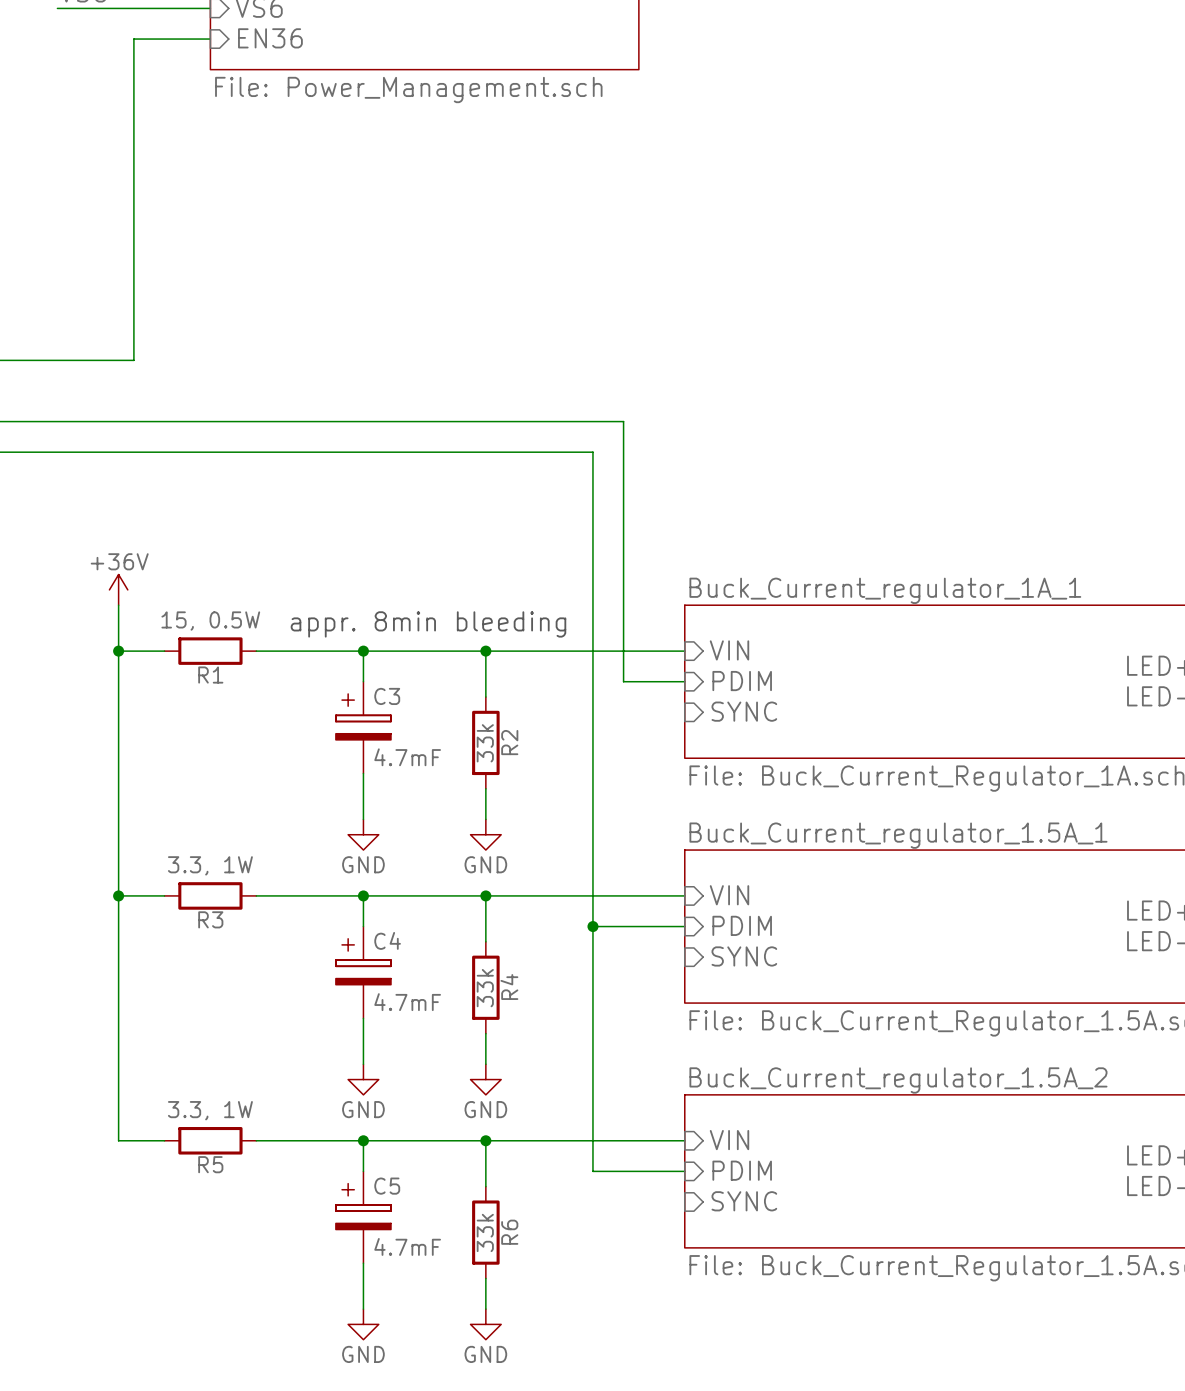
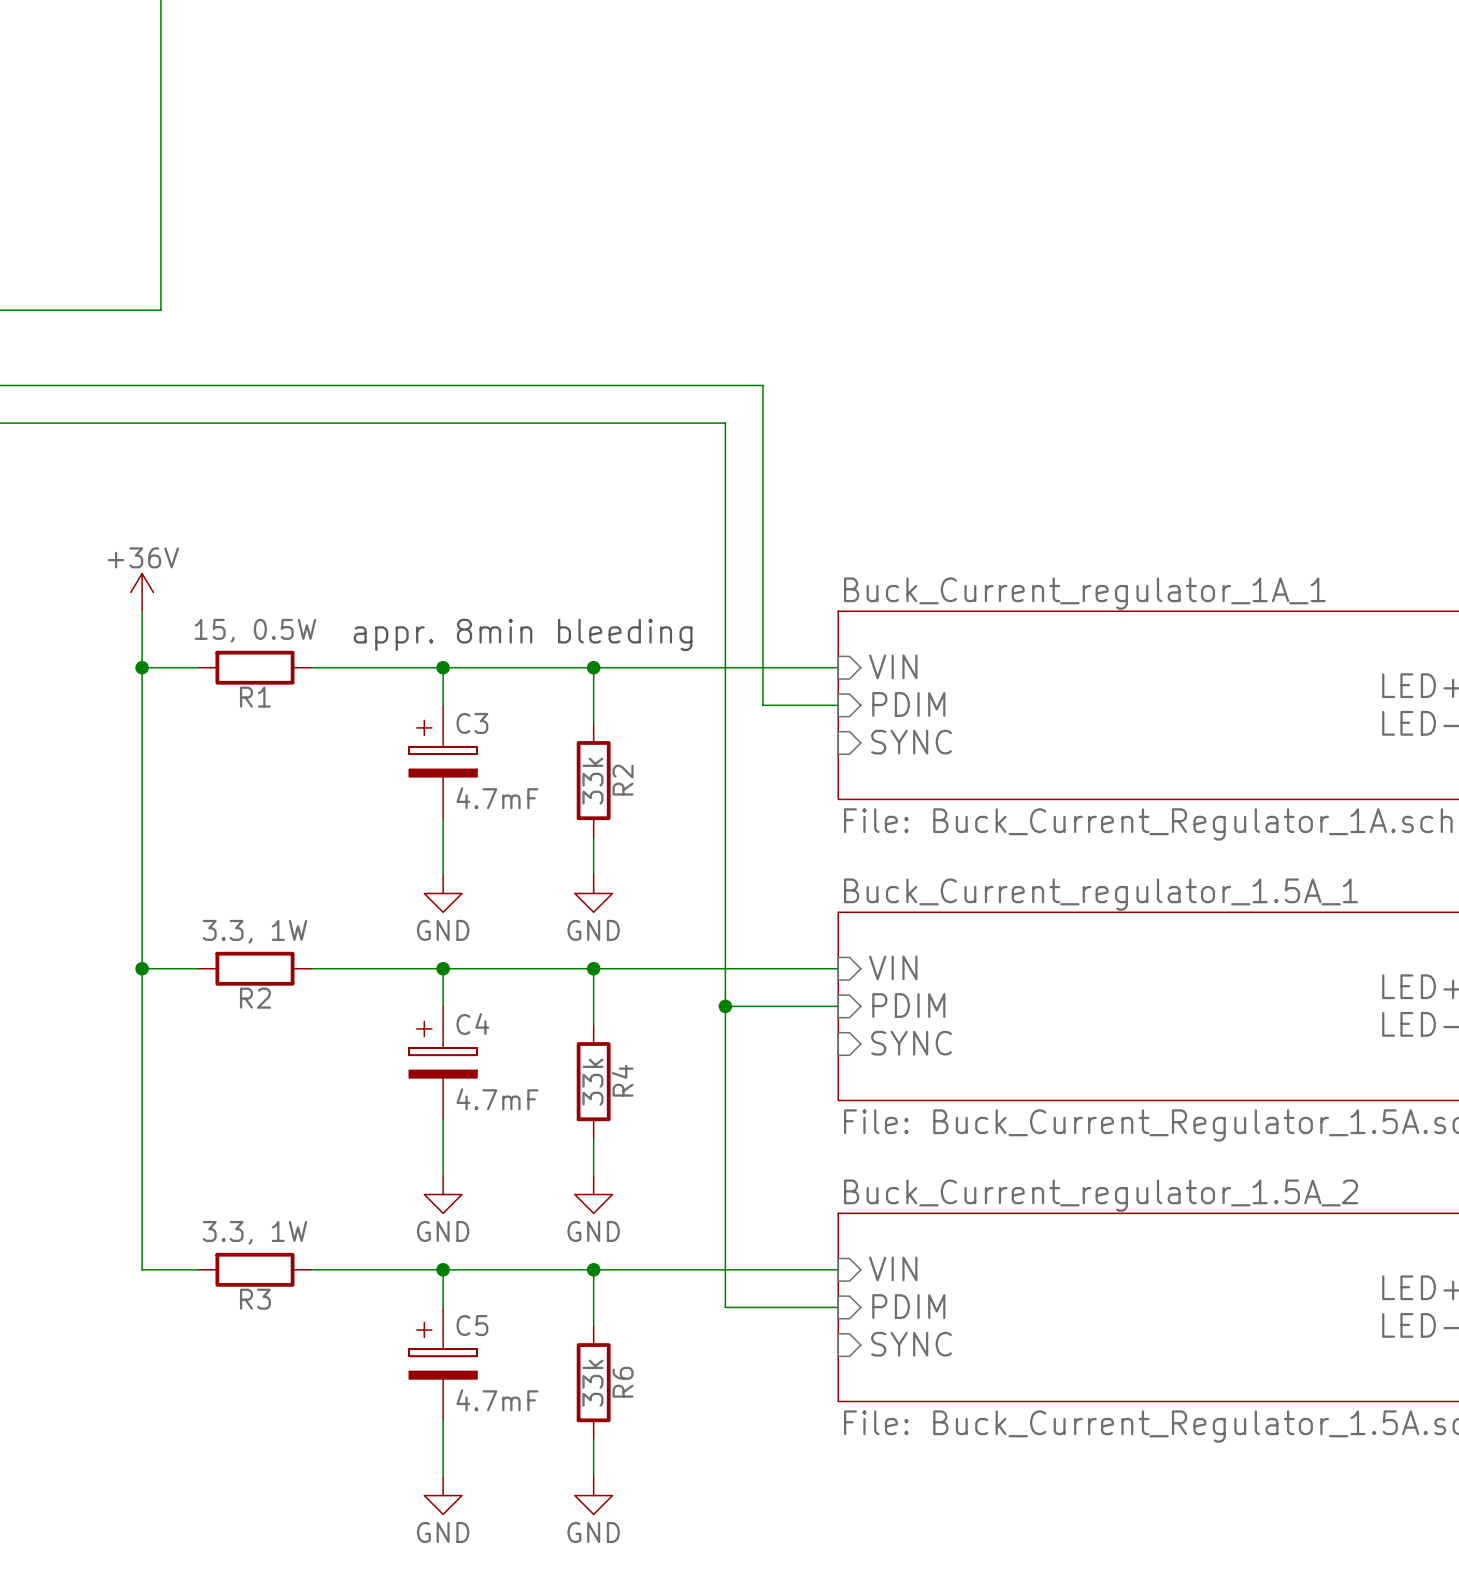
R3 name: R3 (210, 919) -> R2 (255, 998)
R5 name: R5 (210, 1164) -> R3 (255, 1299)

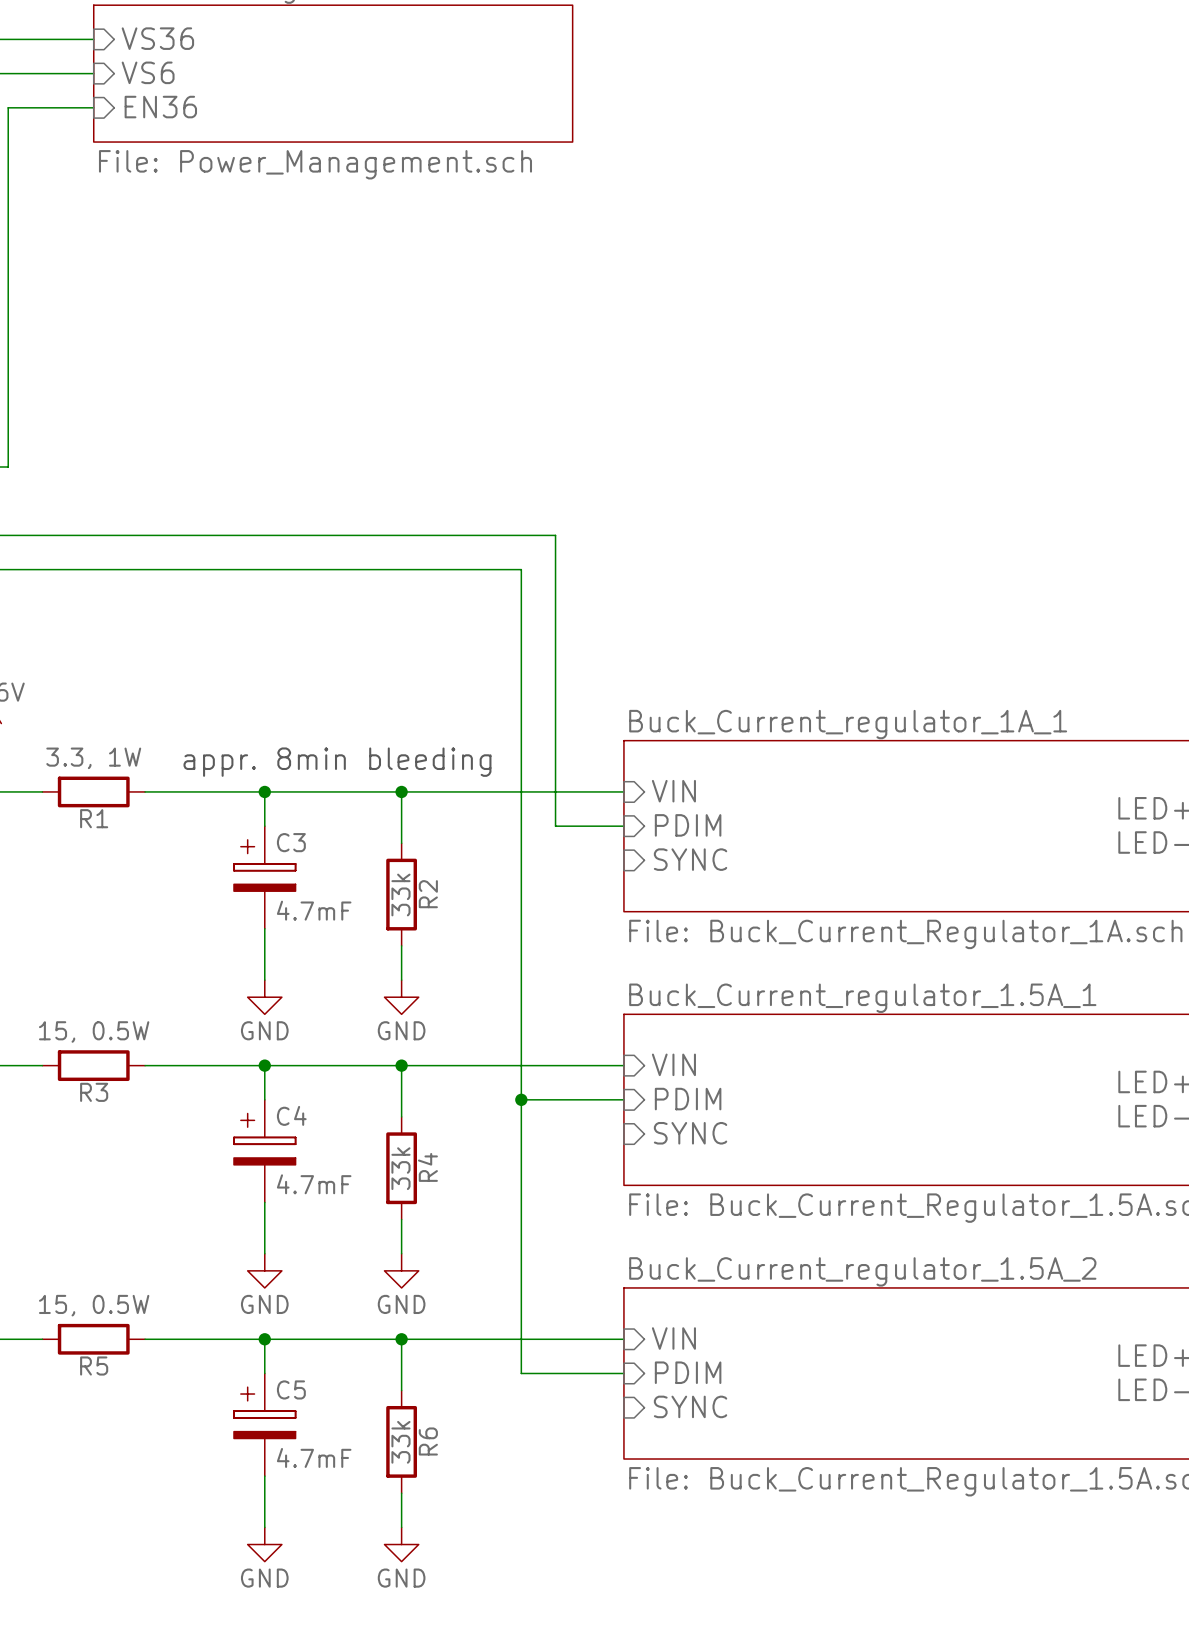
R1 value: 15, 0.5W (255, 630) -> 3.3, 1W (93, 758)
R2 value: 3.3, 1W (254, 931) -> 15, 0.5W (94, 1031)
R2 name: R2 (255, 998) -> R3 (94, 1092)
R3 value: 3.3, 1W (254, 1232) -> 15, 0.5W (94, 1305)
R3 name: R3 (255, 1299) -> R5 (94, 1366)

